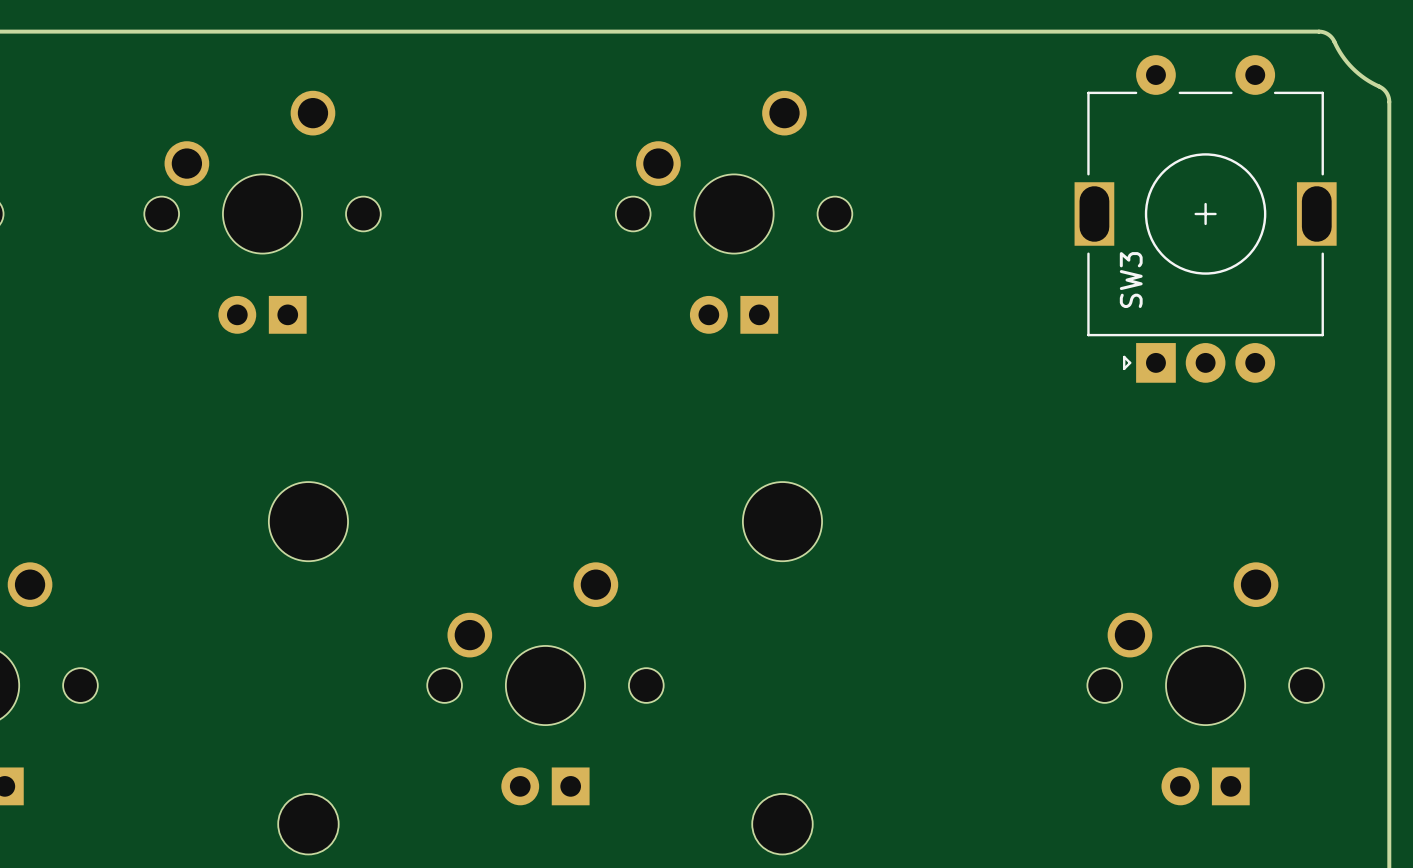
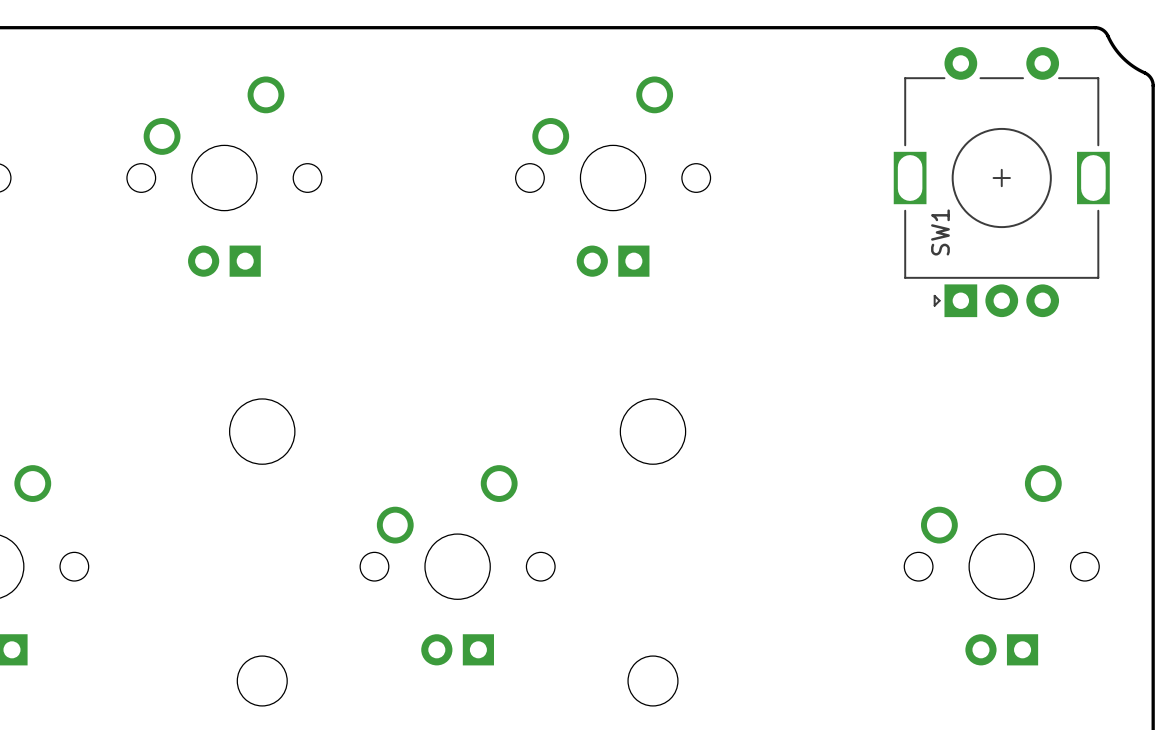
SW3 name: SW3 (1131, 280) -> SW1 (940, 232)

